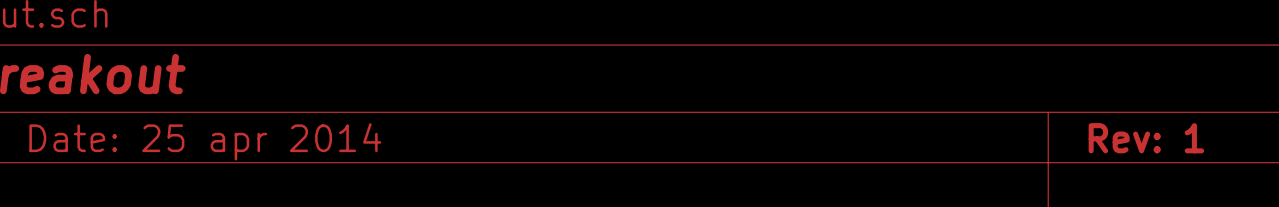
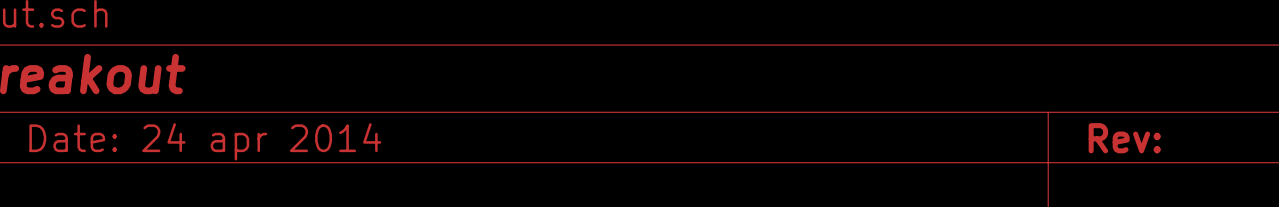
title block: Rev: 1 (1146, 138) -> Rev: (1124, 138)
title block: Date: 25 apr 2014 (205, 141) -> Date: 24 apr 2014 (205, 141)

